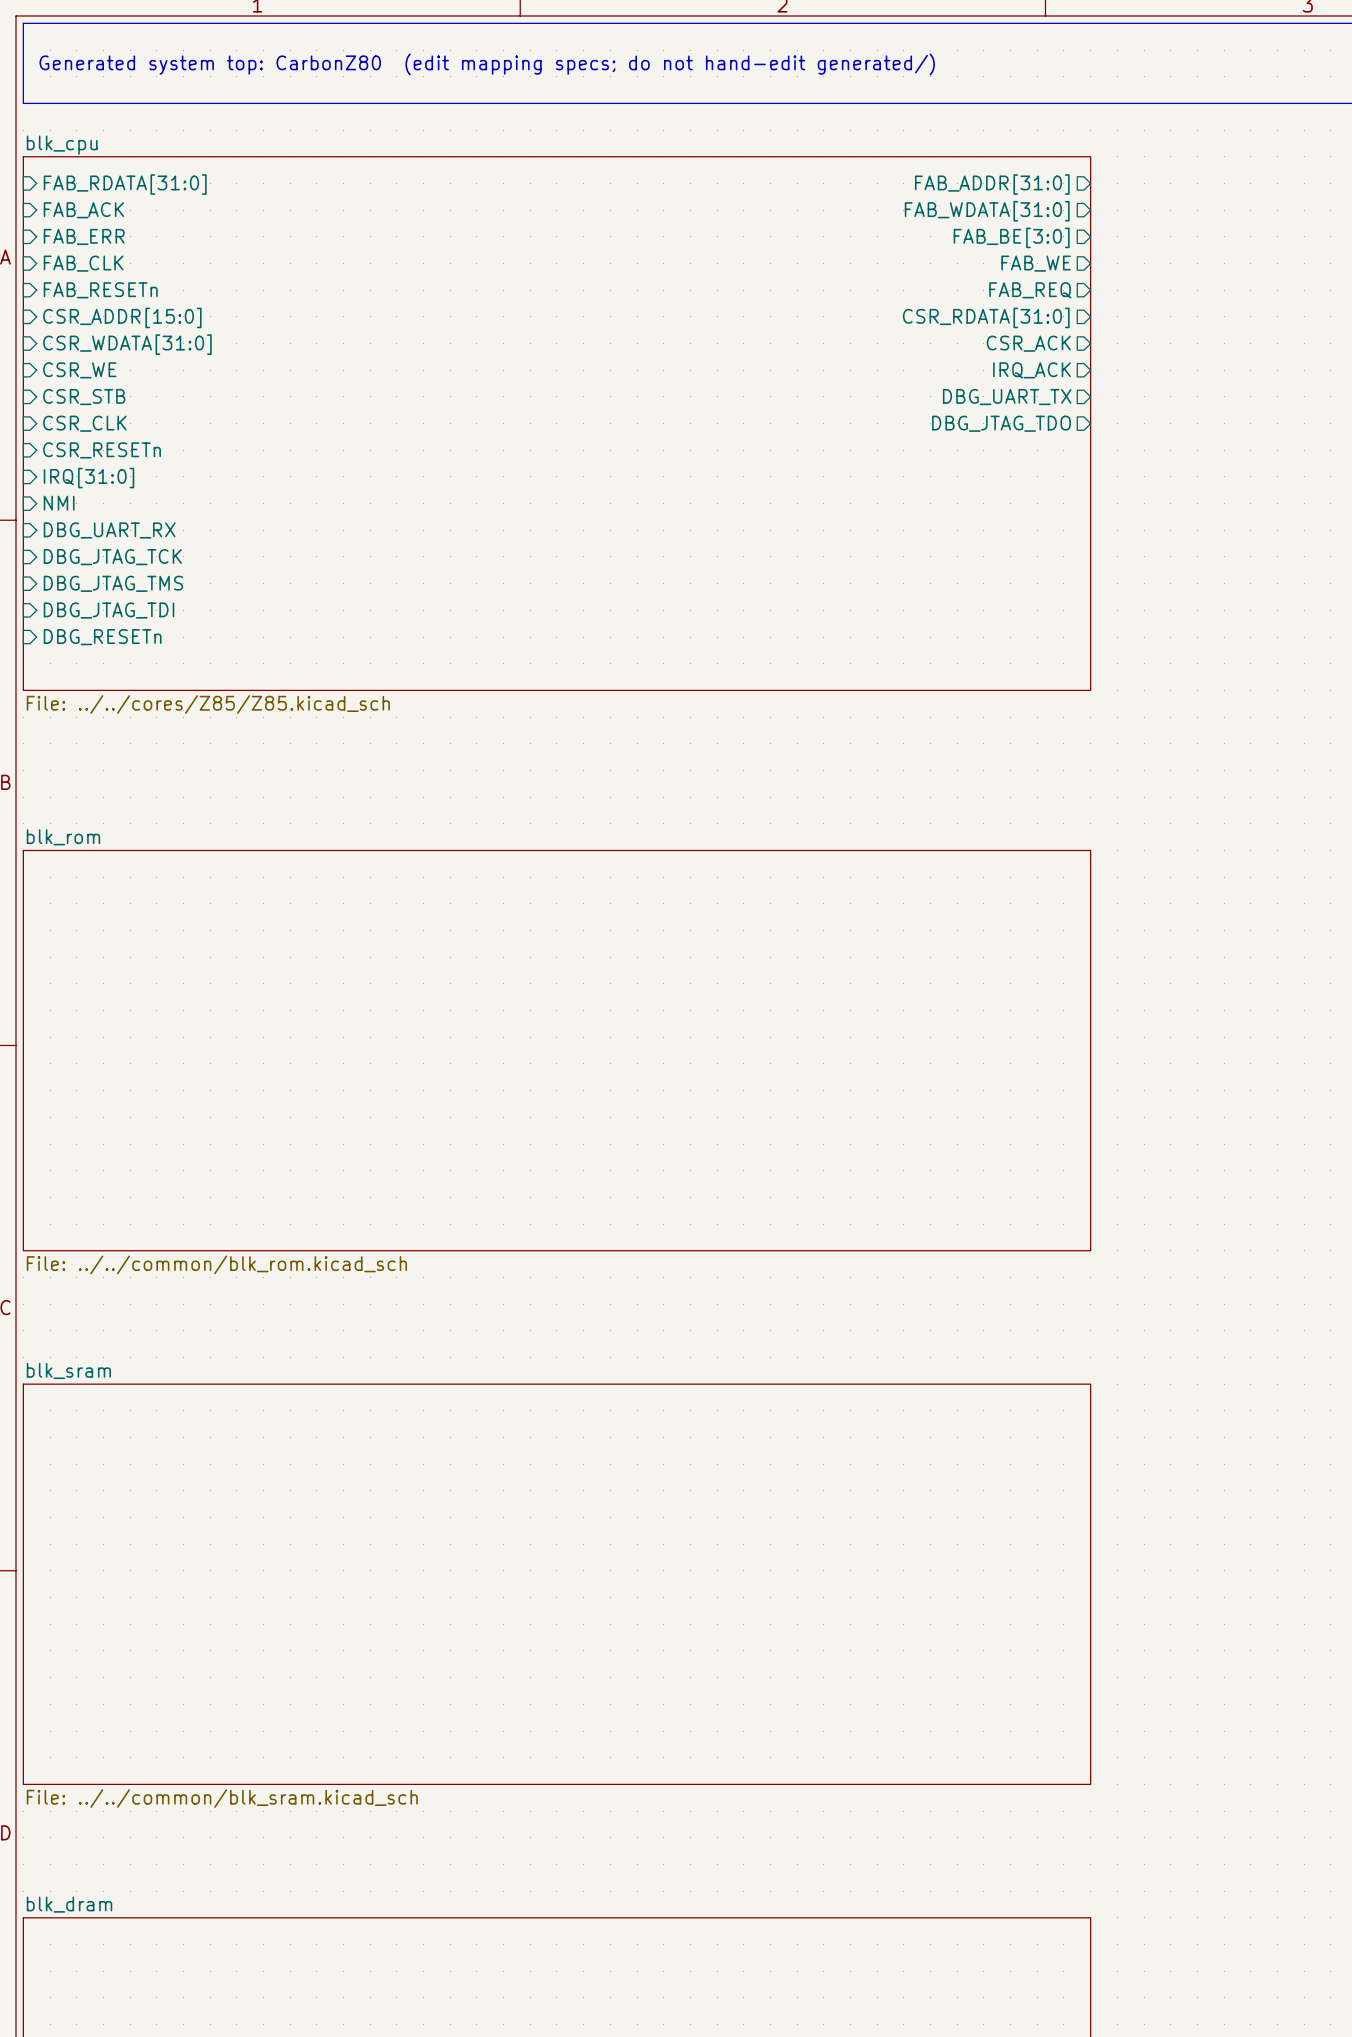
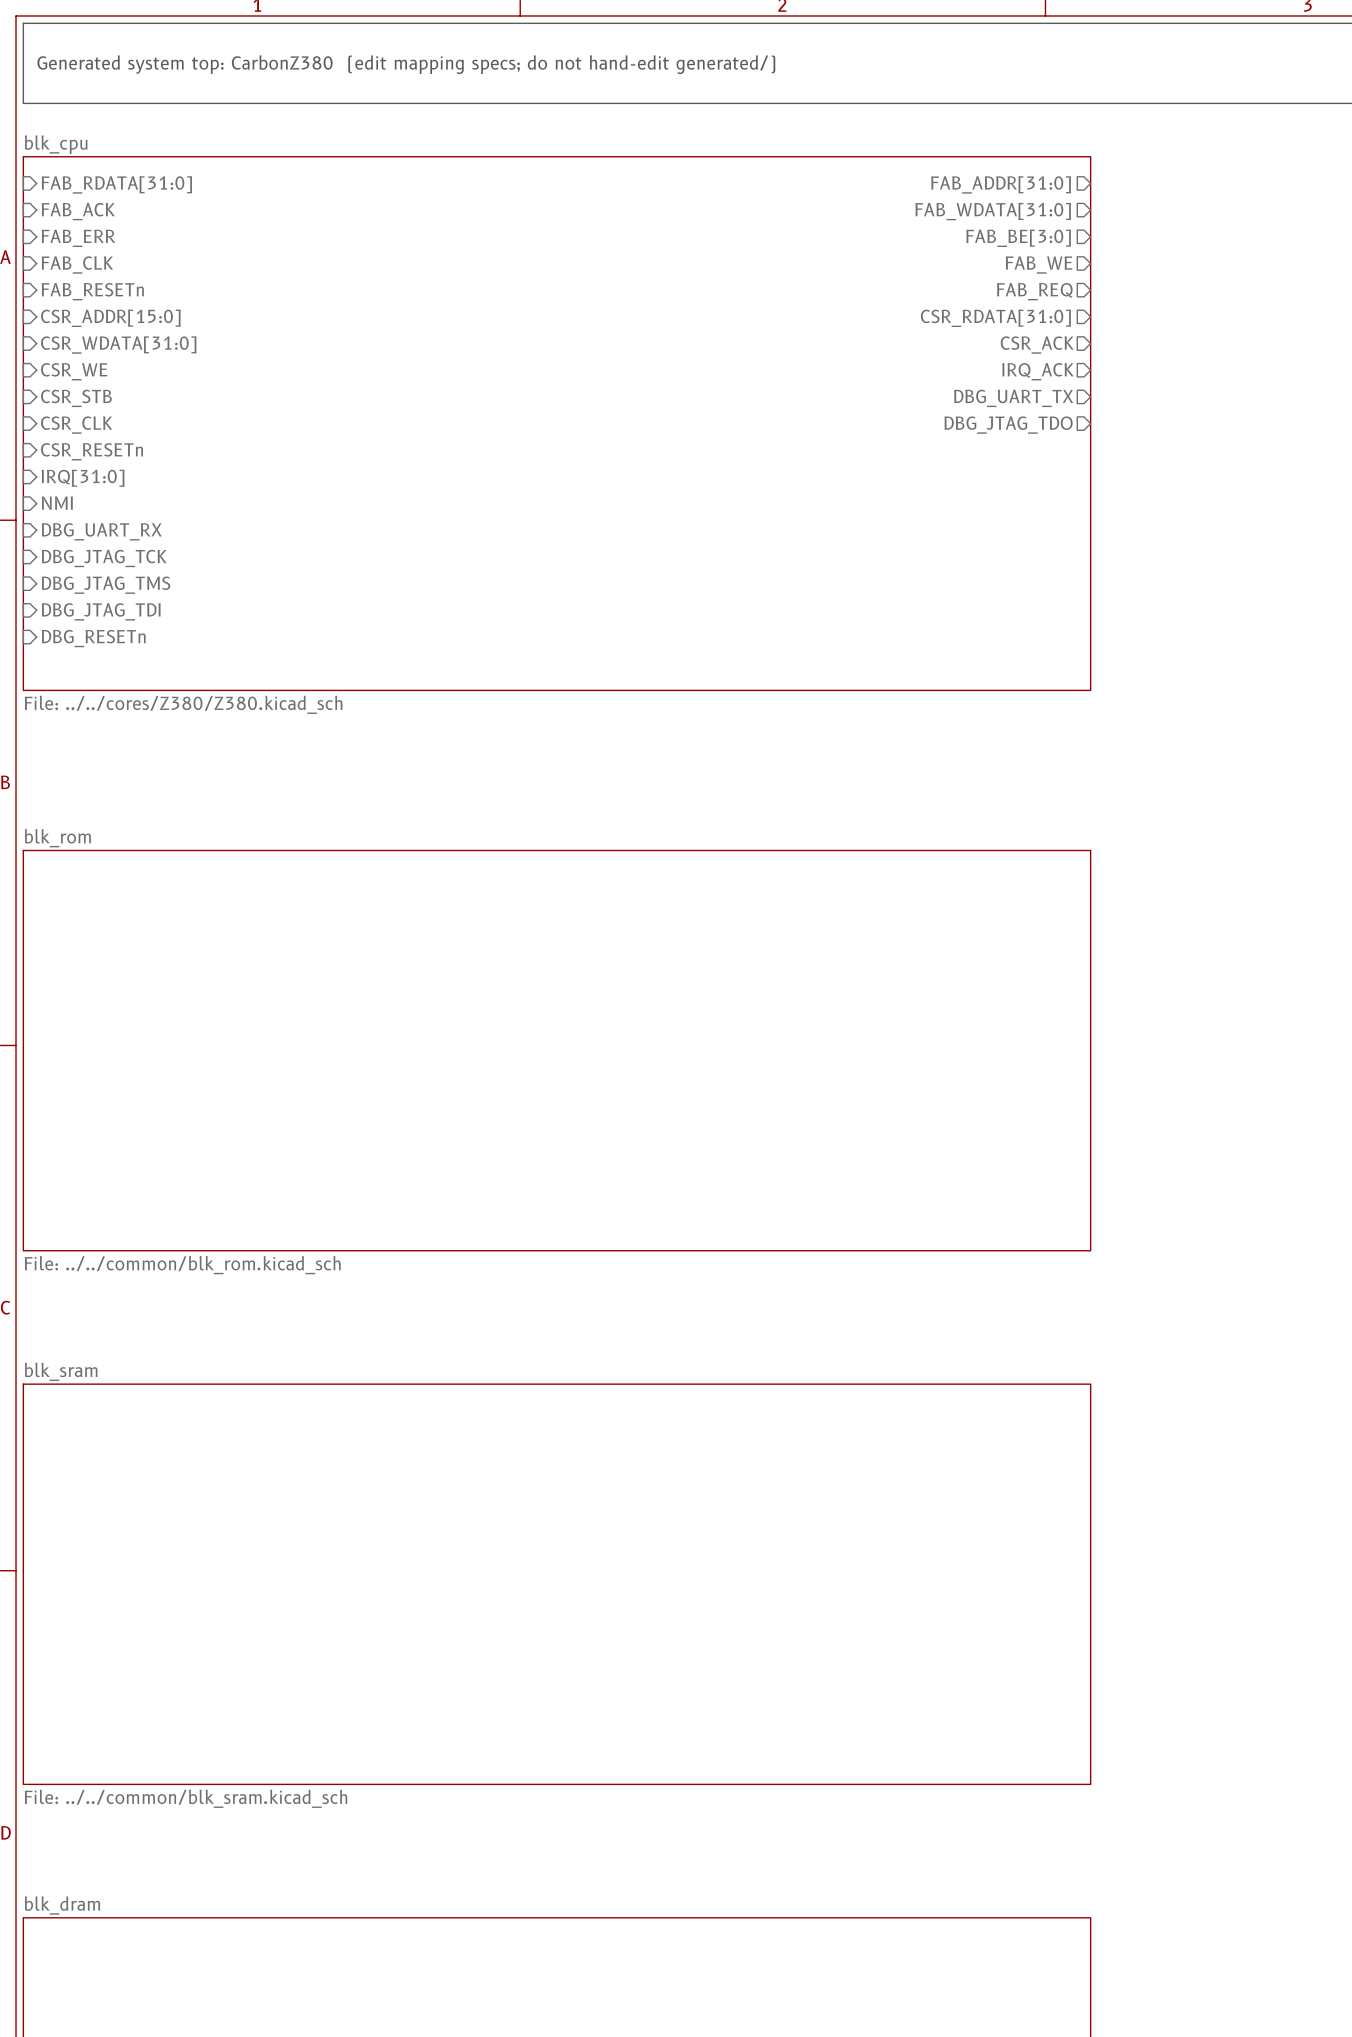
text: Generated system top: CarbonZ80 (edit mapping specs; do not hand-edit generated/) (487, 64) -> Generated system top: CarbonZ380 (edit mapping specs; do not hand-edit generated/) (406, 64)
sheet blk_cpu value: File: ../../cores/Z85/Z85.kicad_sch (208, 704) -> File: ../../cores/Z380/Z380.kicad_sch (183, 704)

